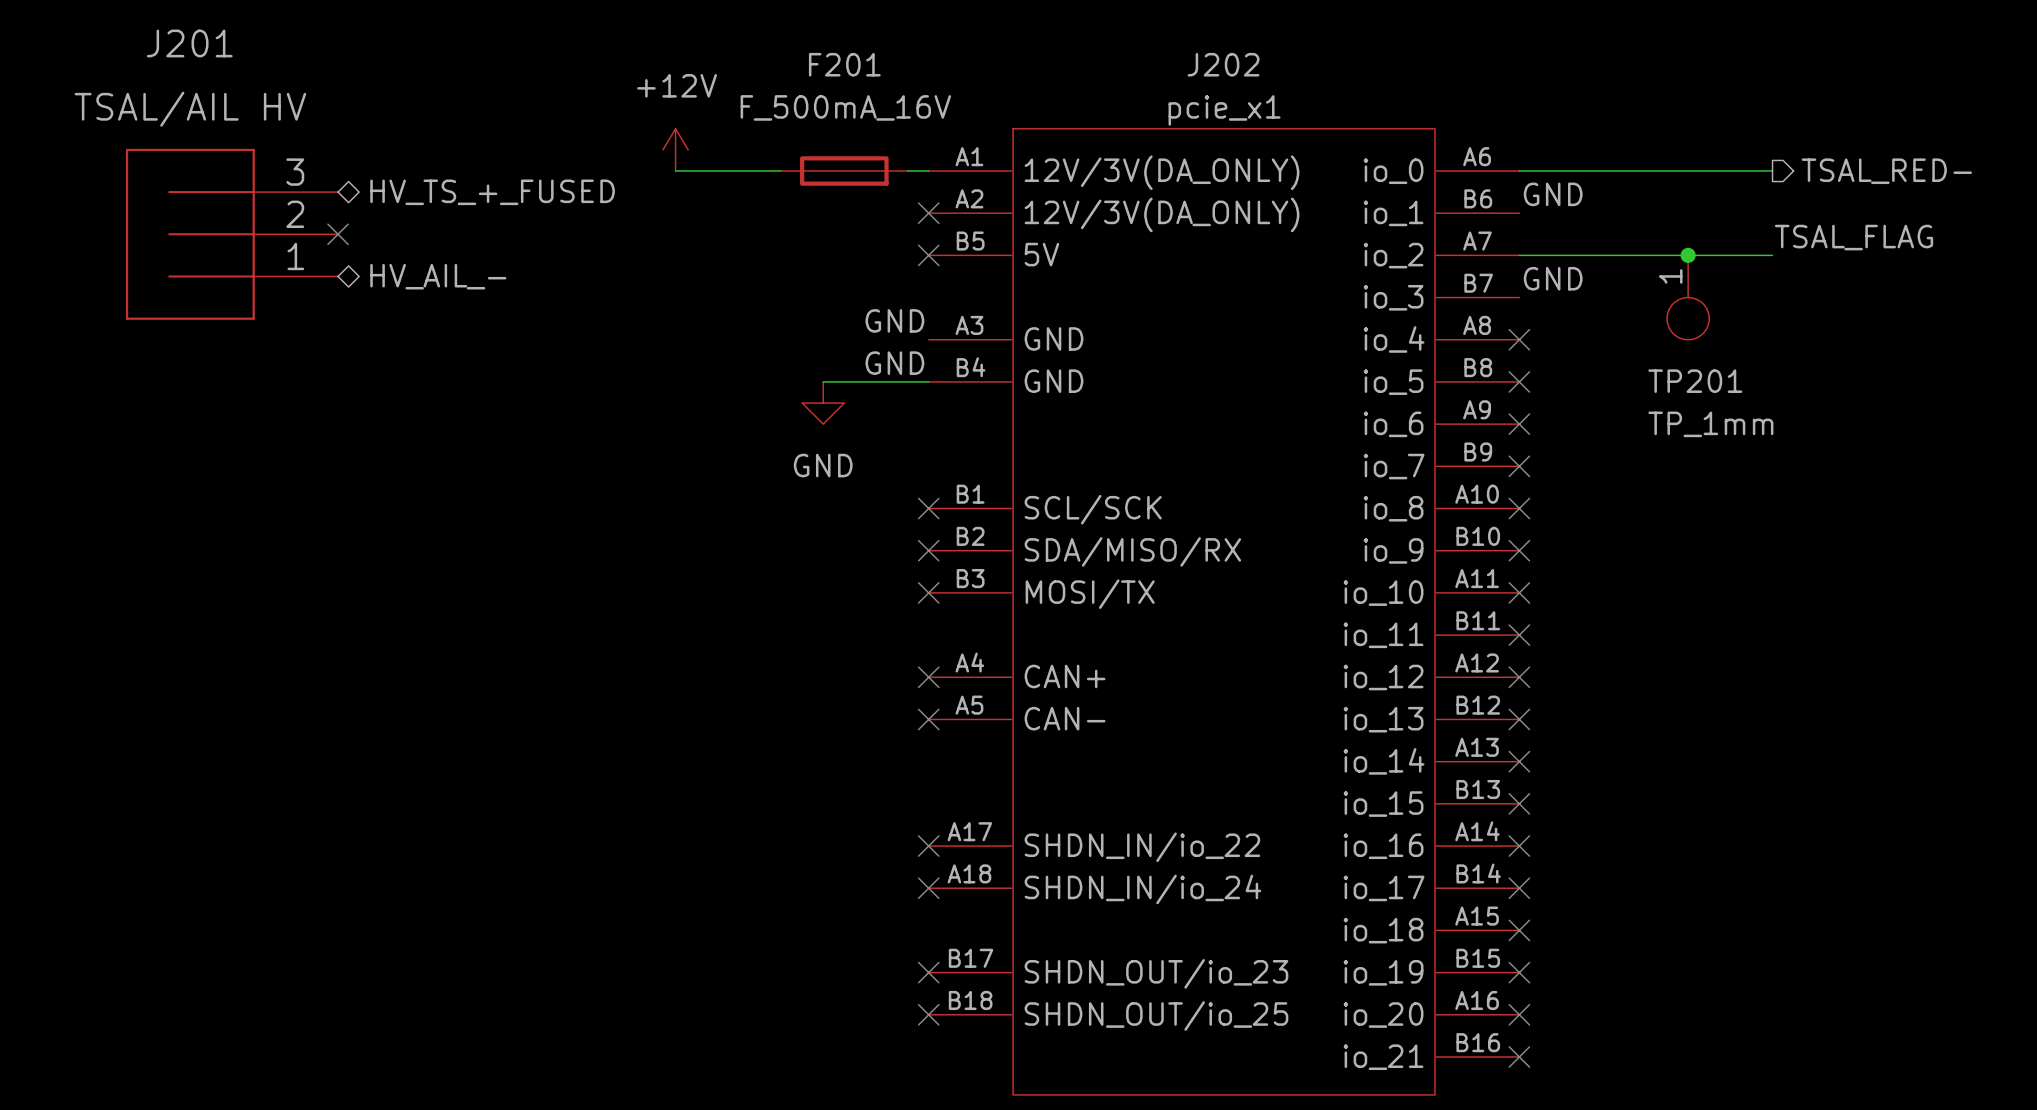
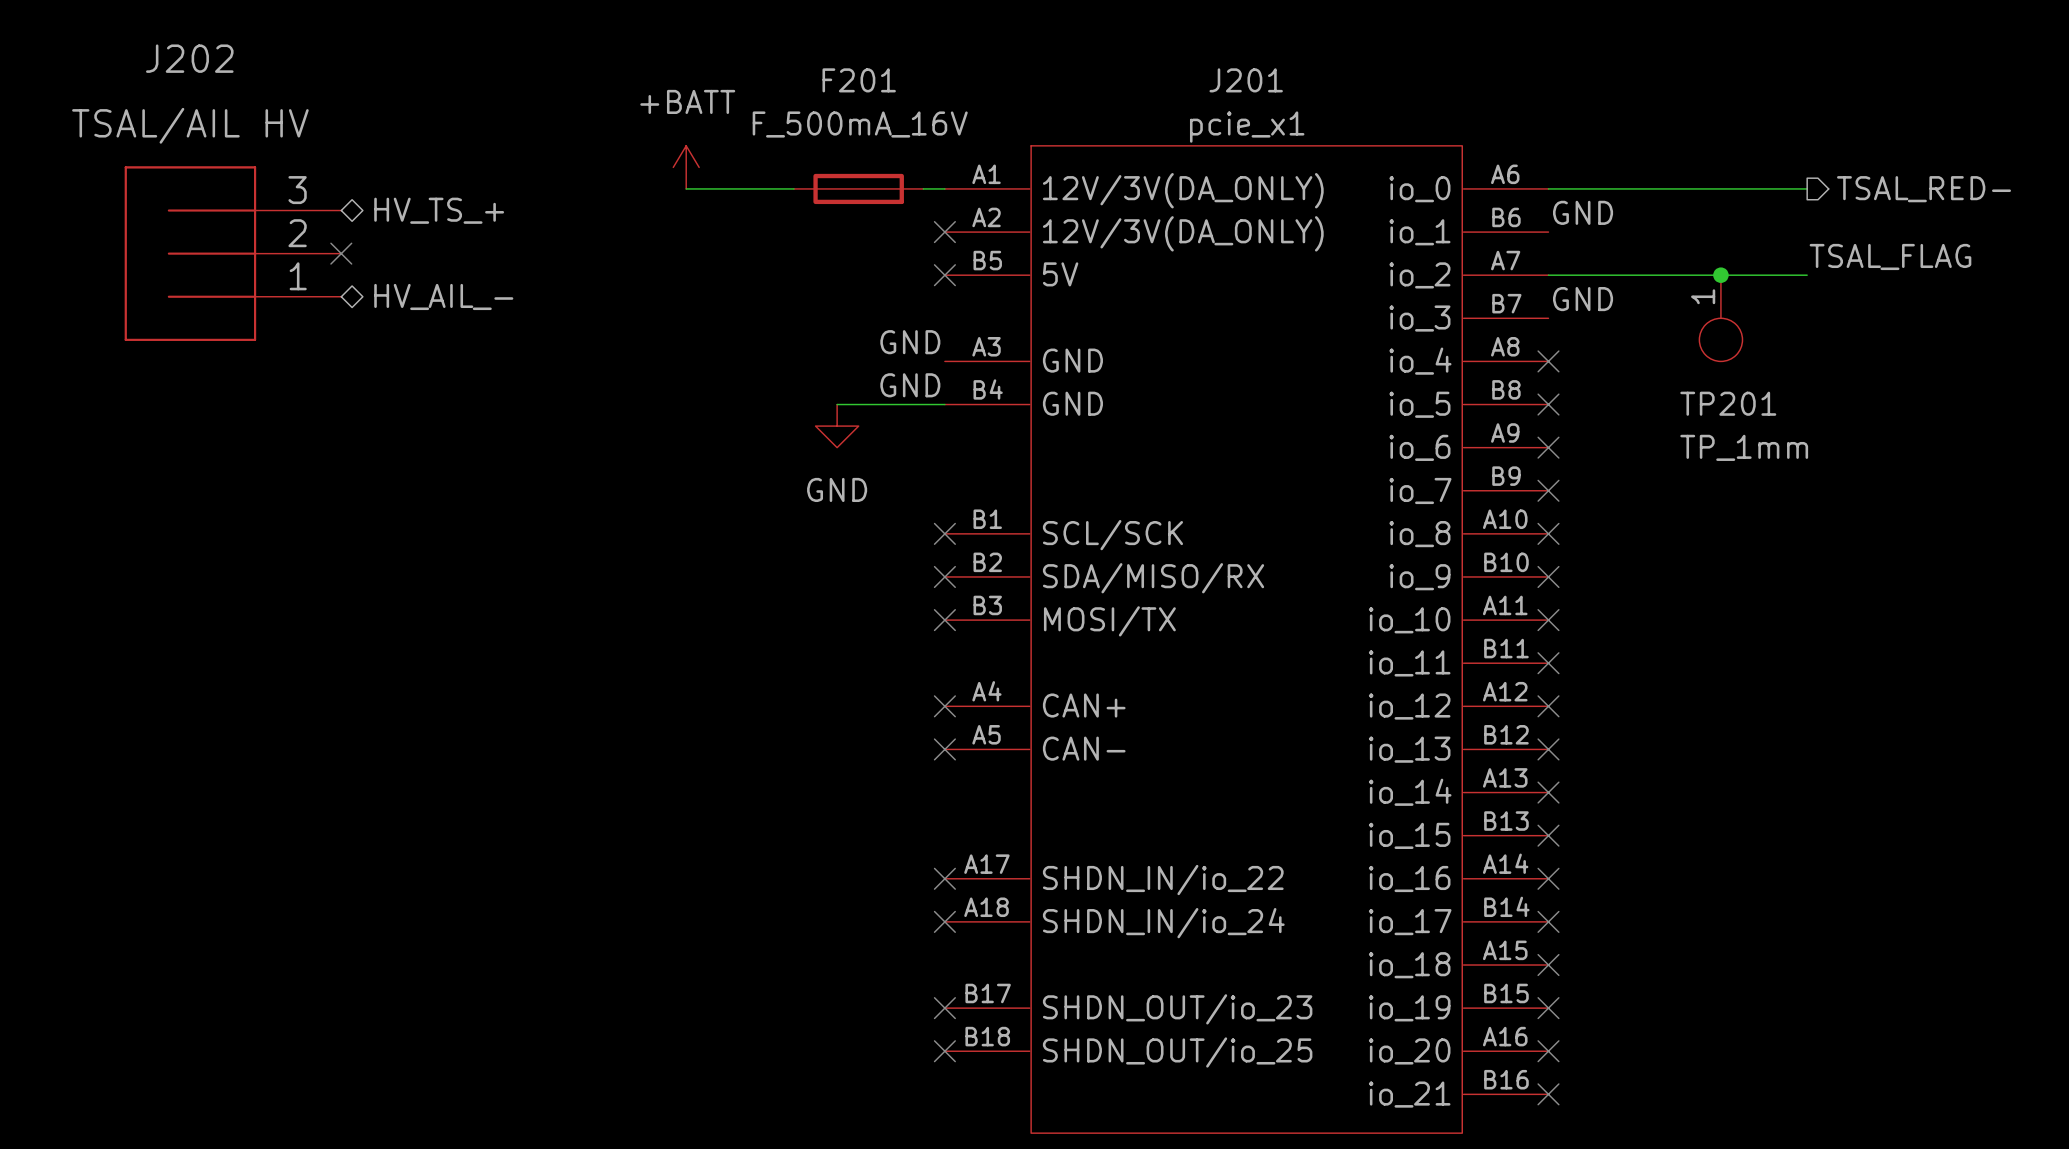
J201 name: J201 (189, 43) -> J202 (189, 58)
J202 name: J202 (1223, 64) -> J201 (1246, 80)
power symbol: +12V (675, 149) -> +BATT (686, 167)
hierarchical label: HV_TS_+_FUSED (492, 192) -> HV_TS_+ (439, 210)

